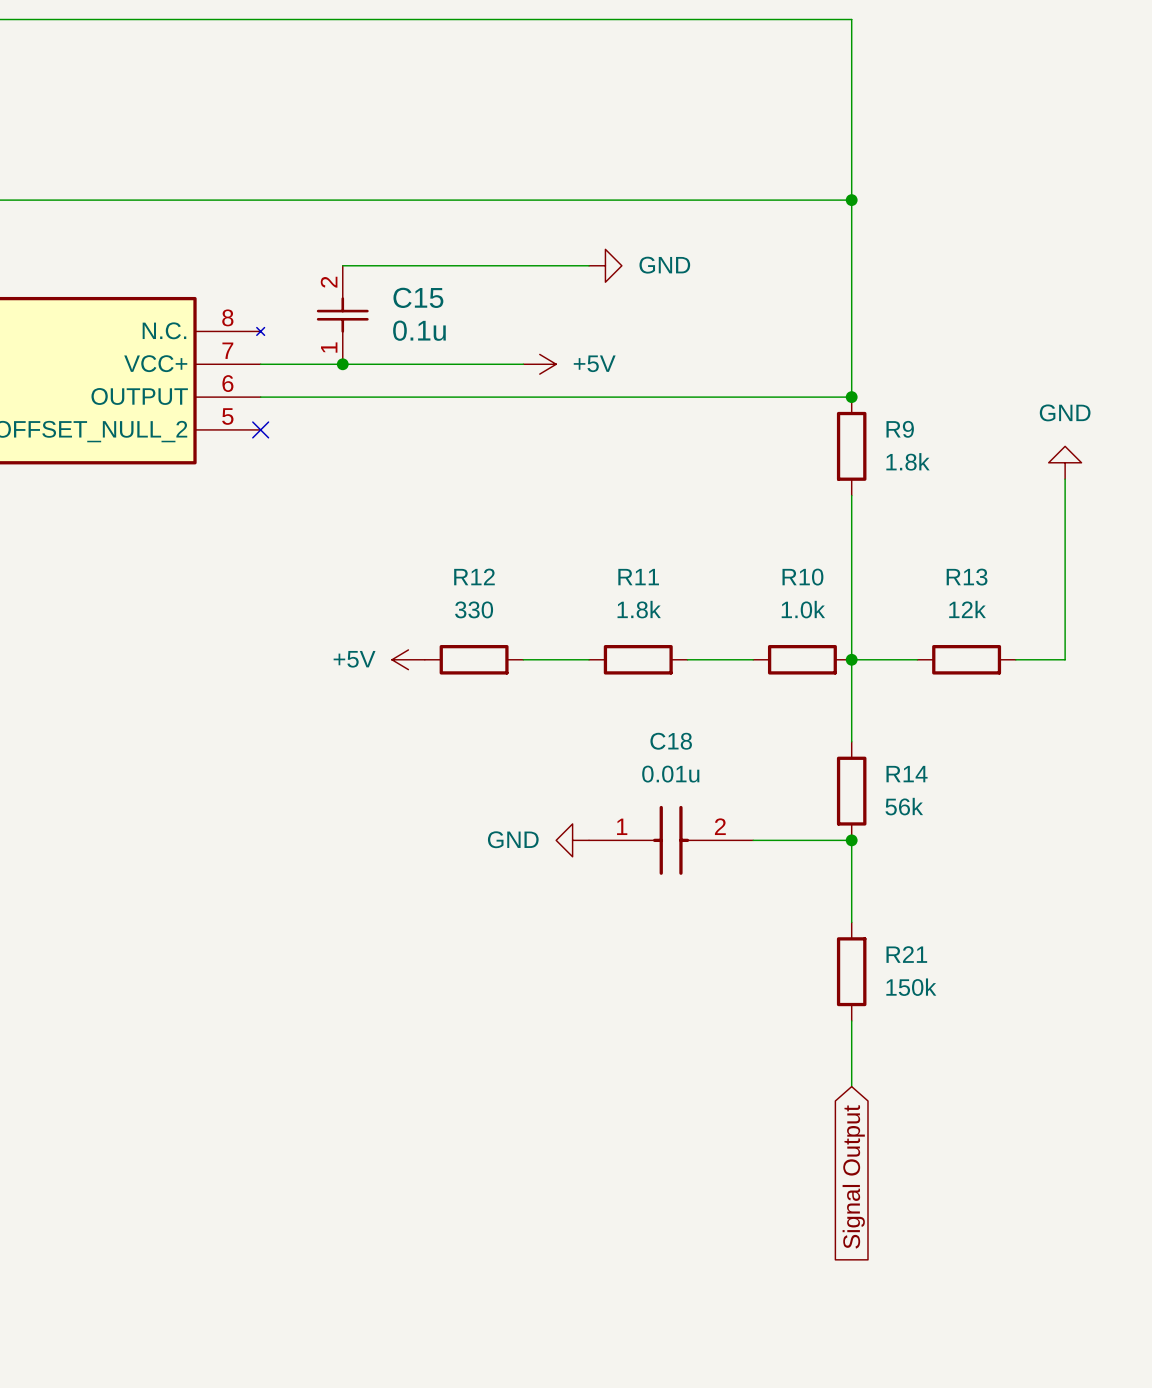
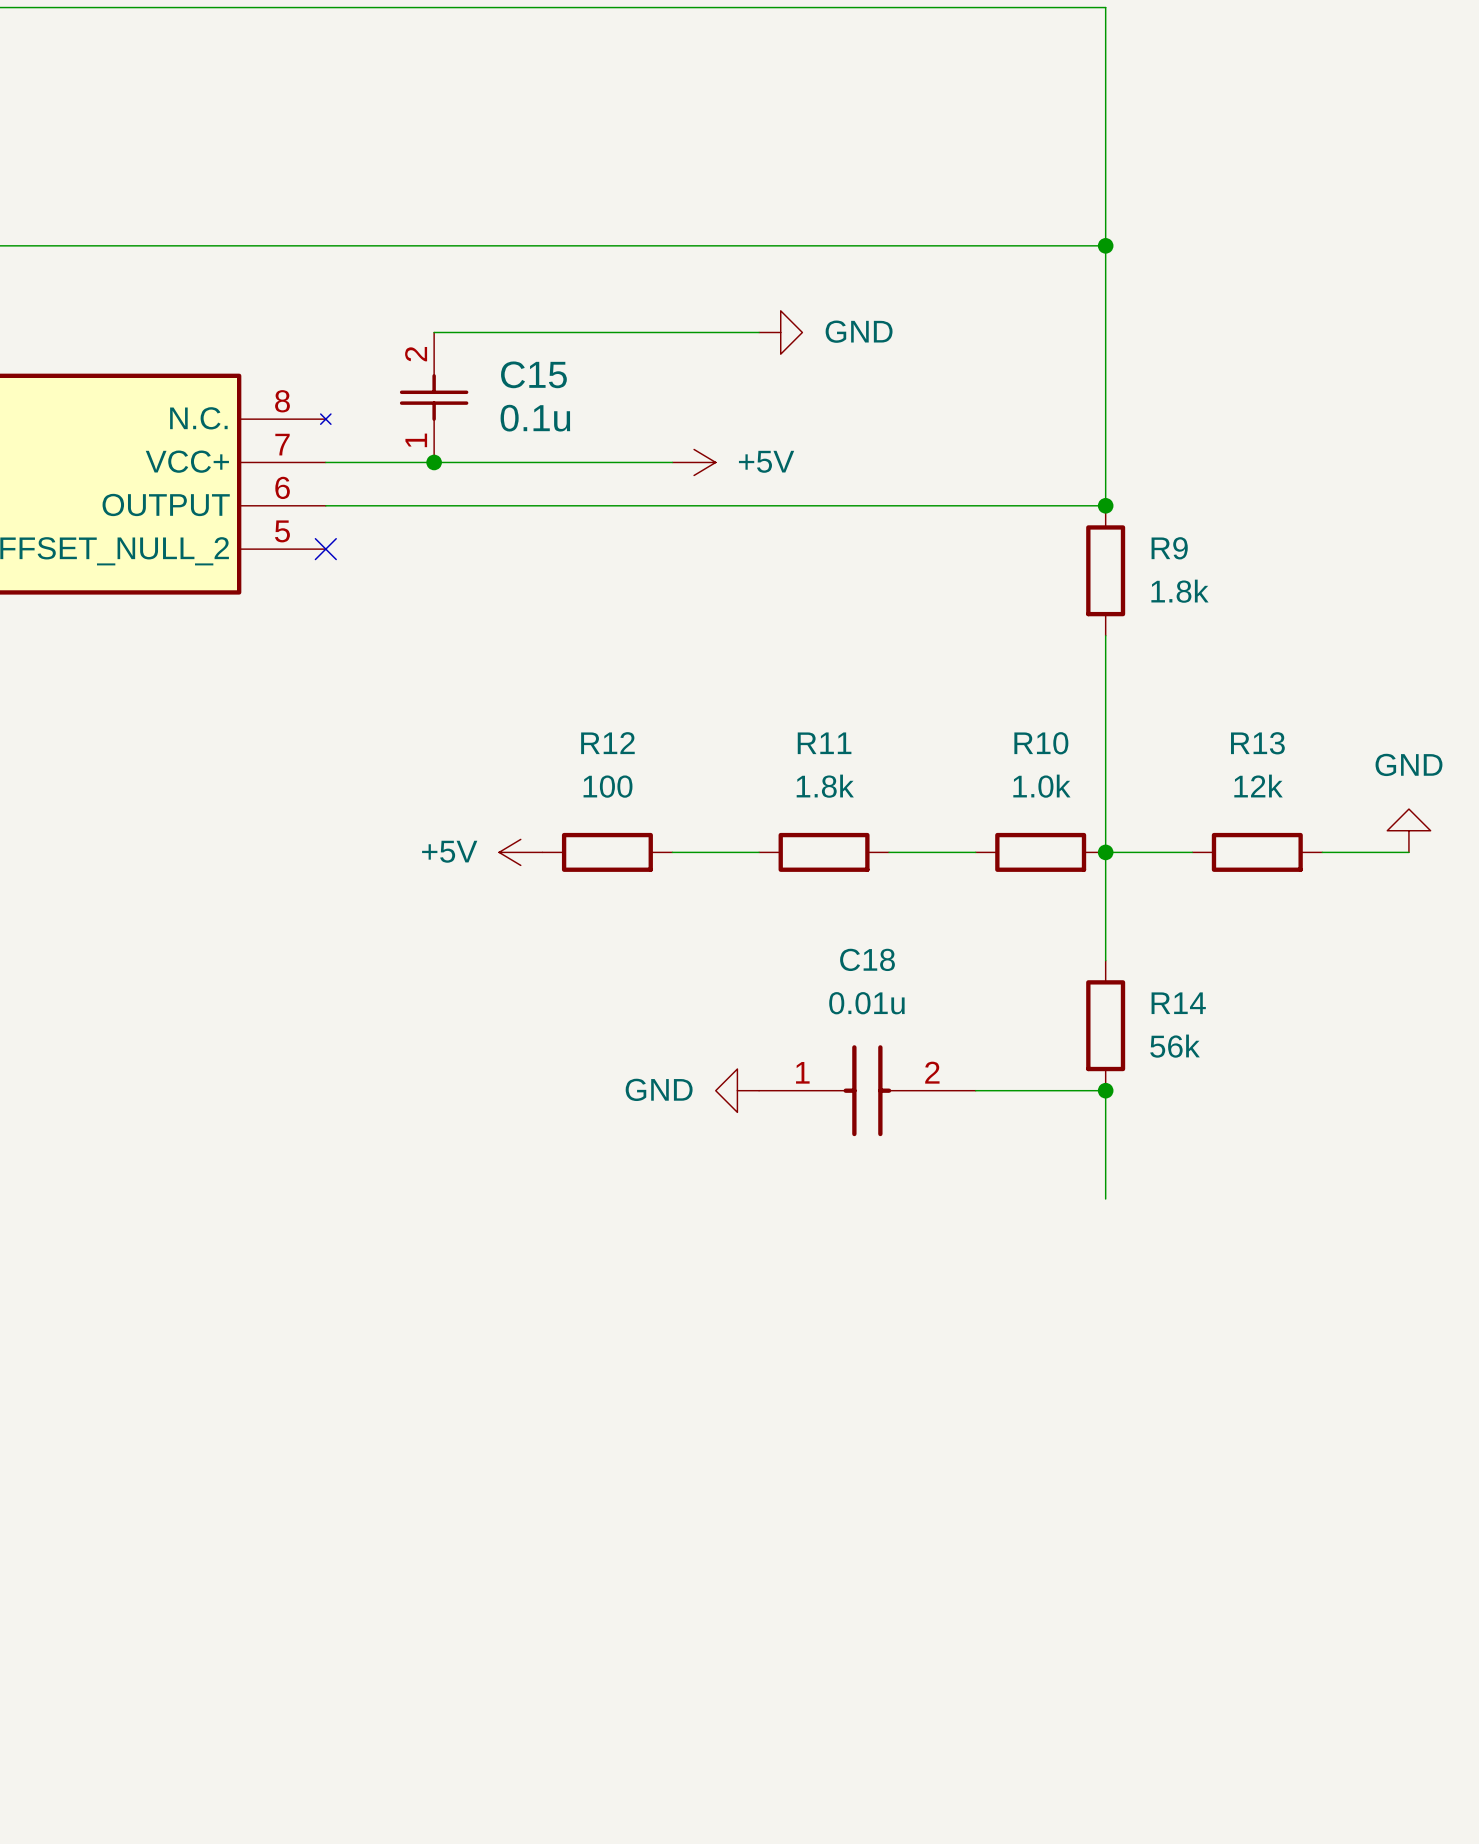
power symbol position: GND (1065, 462) -> GND (1408, 830)
wire: (1065, 479) (1065, 659) -> (1408, 852) (1387, 852)
R12 value: 330 (474, 609) -> 100 (608, 786)
R21: 150k (851, 971) -> none
wire: (851, 1020) (851, 1086) -> none
global label: Signal Output (853, 1176) -> none

